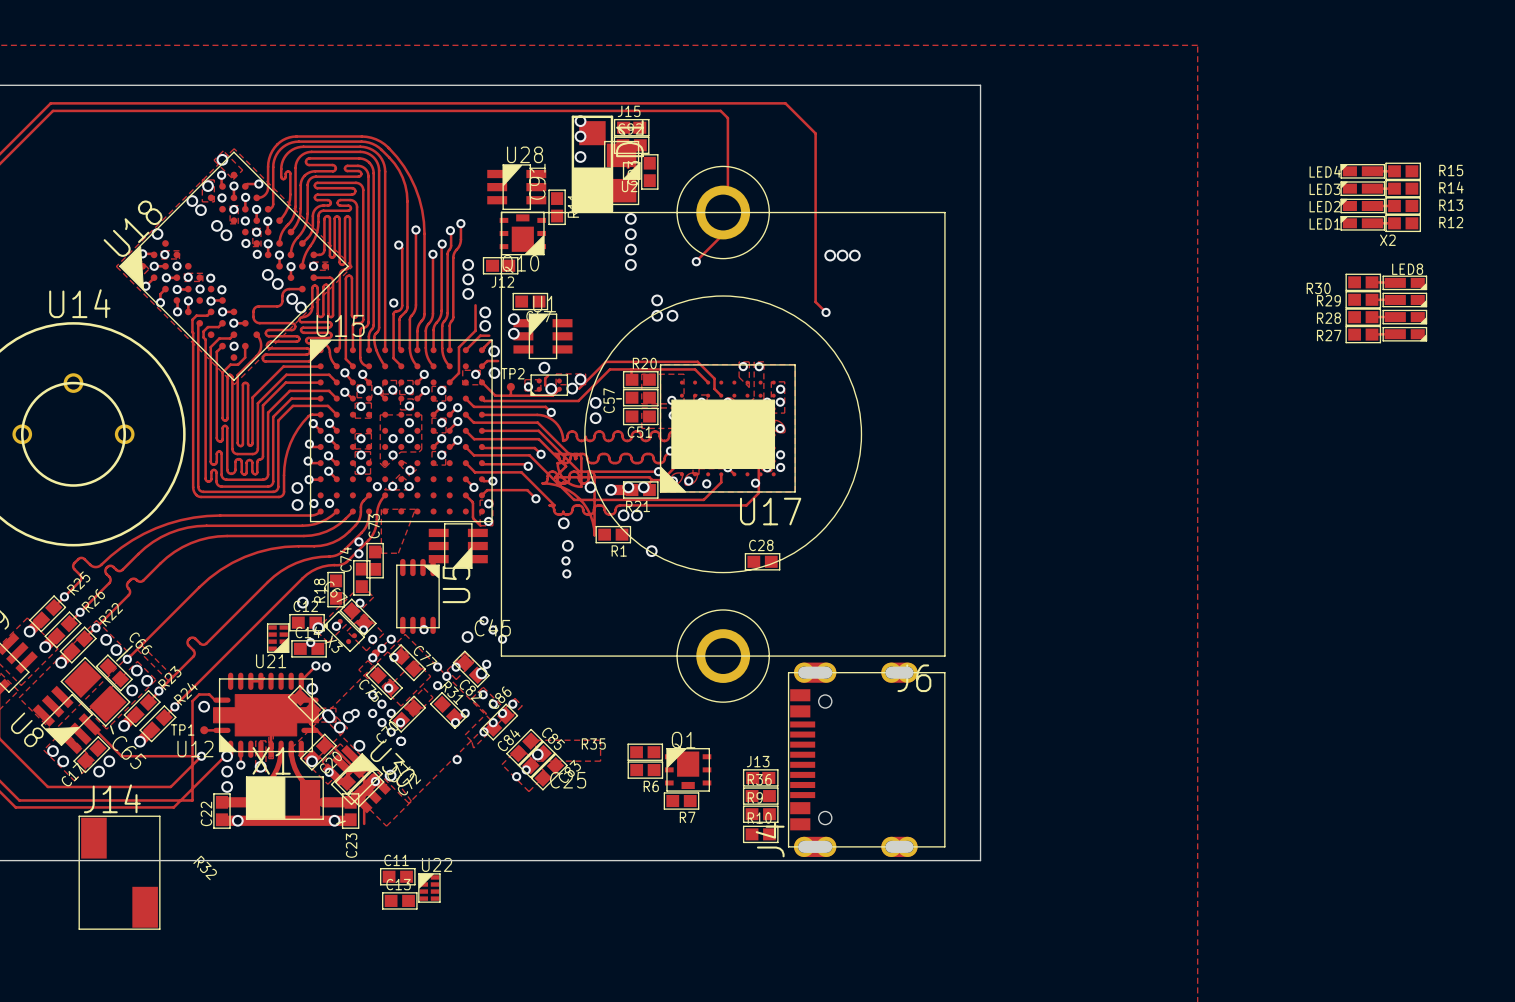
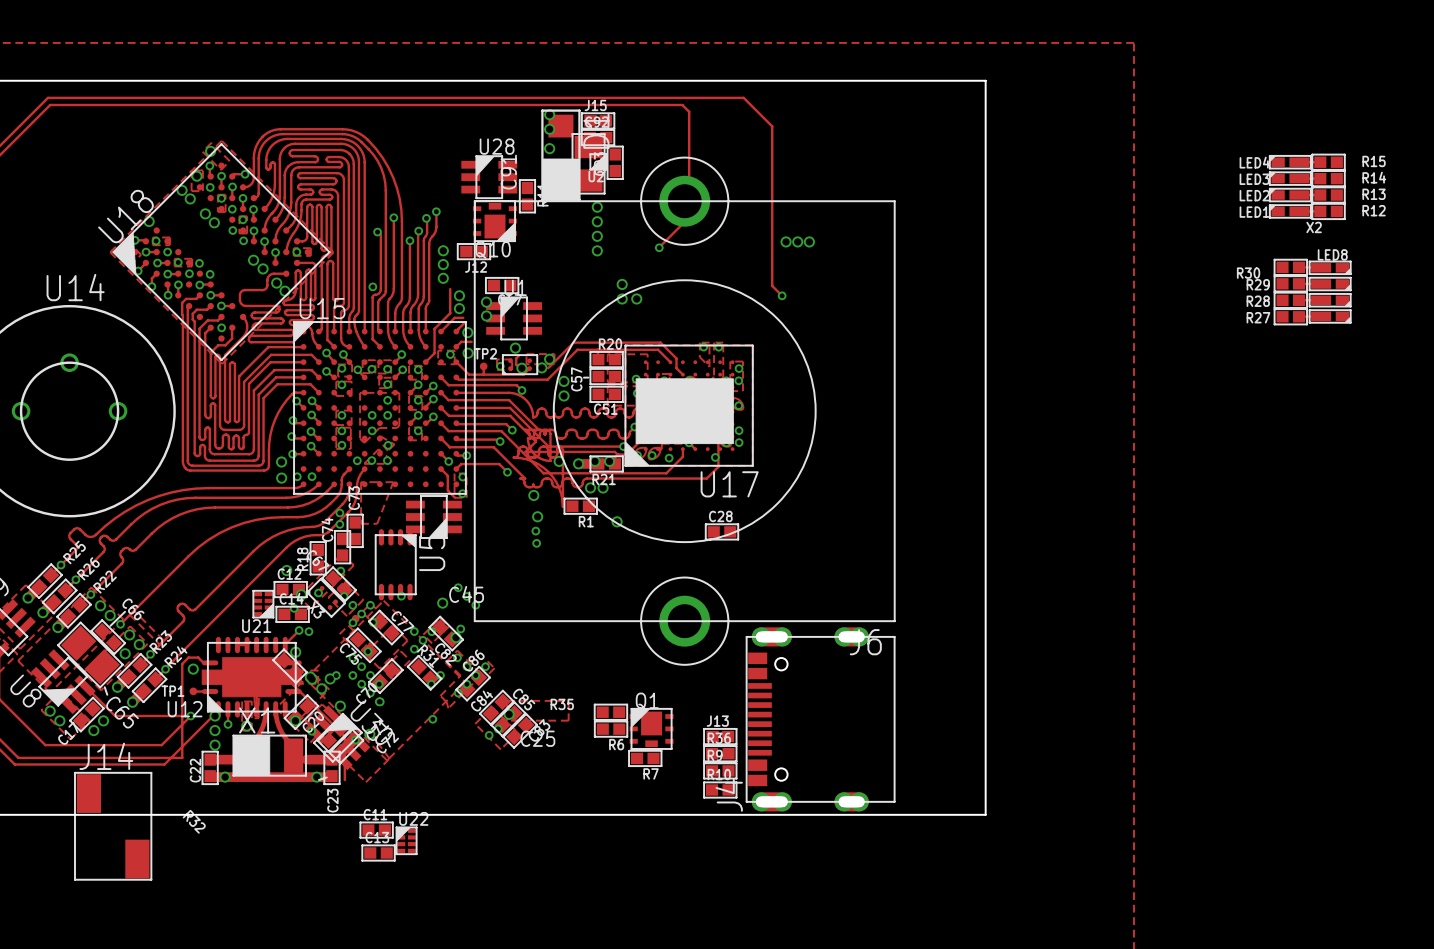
board edge: (980, 85) (980, 860) -> (928, 80) (985, 80) (985, 814) (928, 814)

